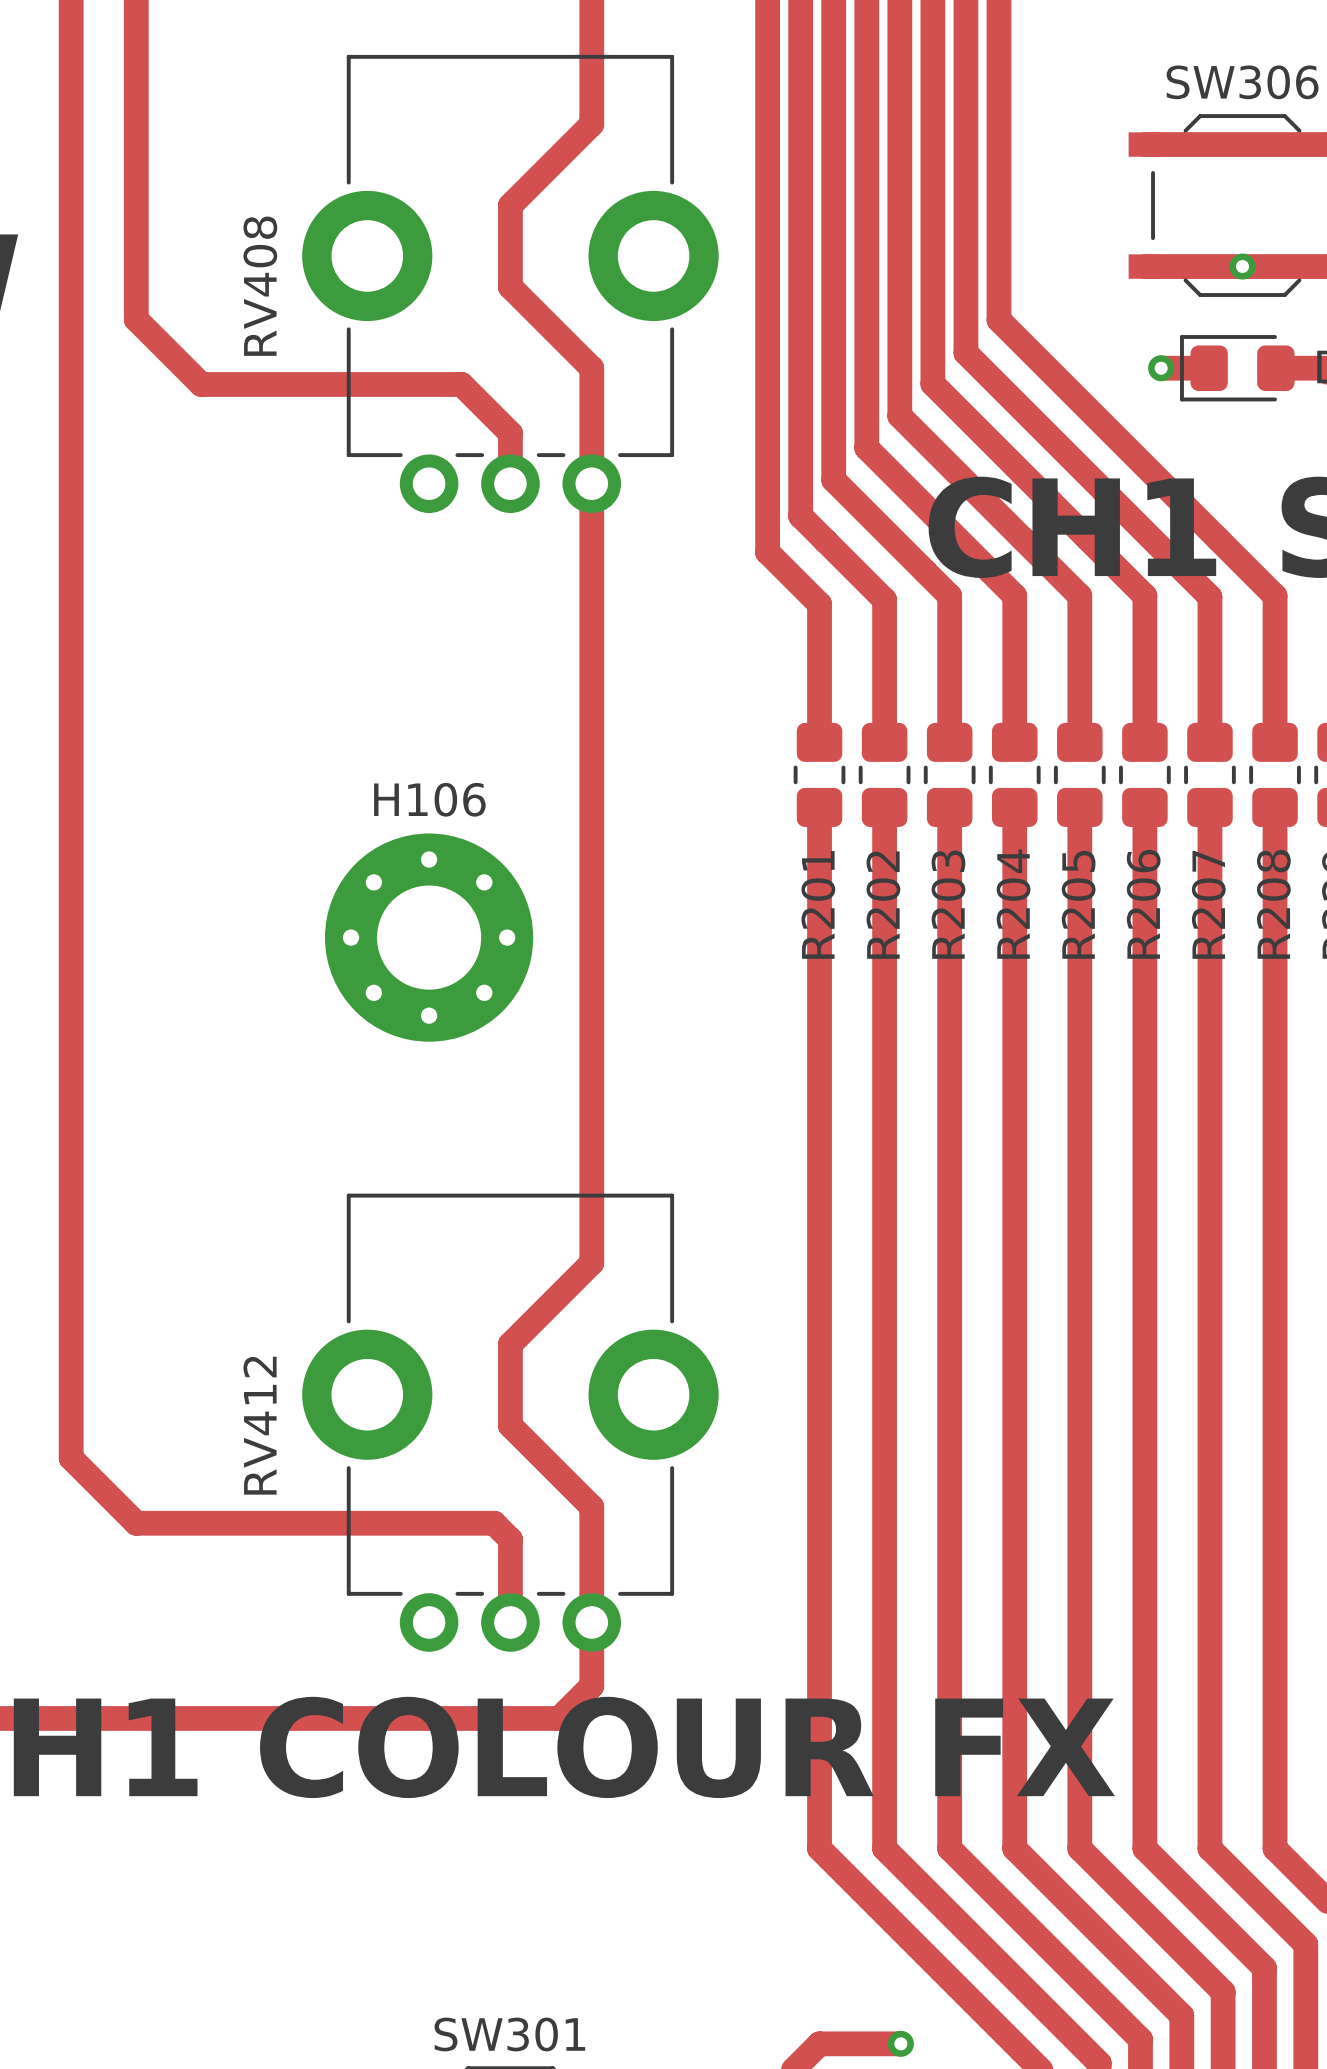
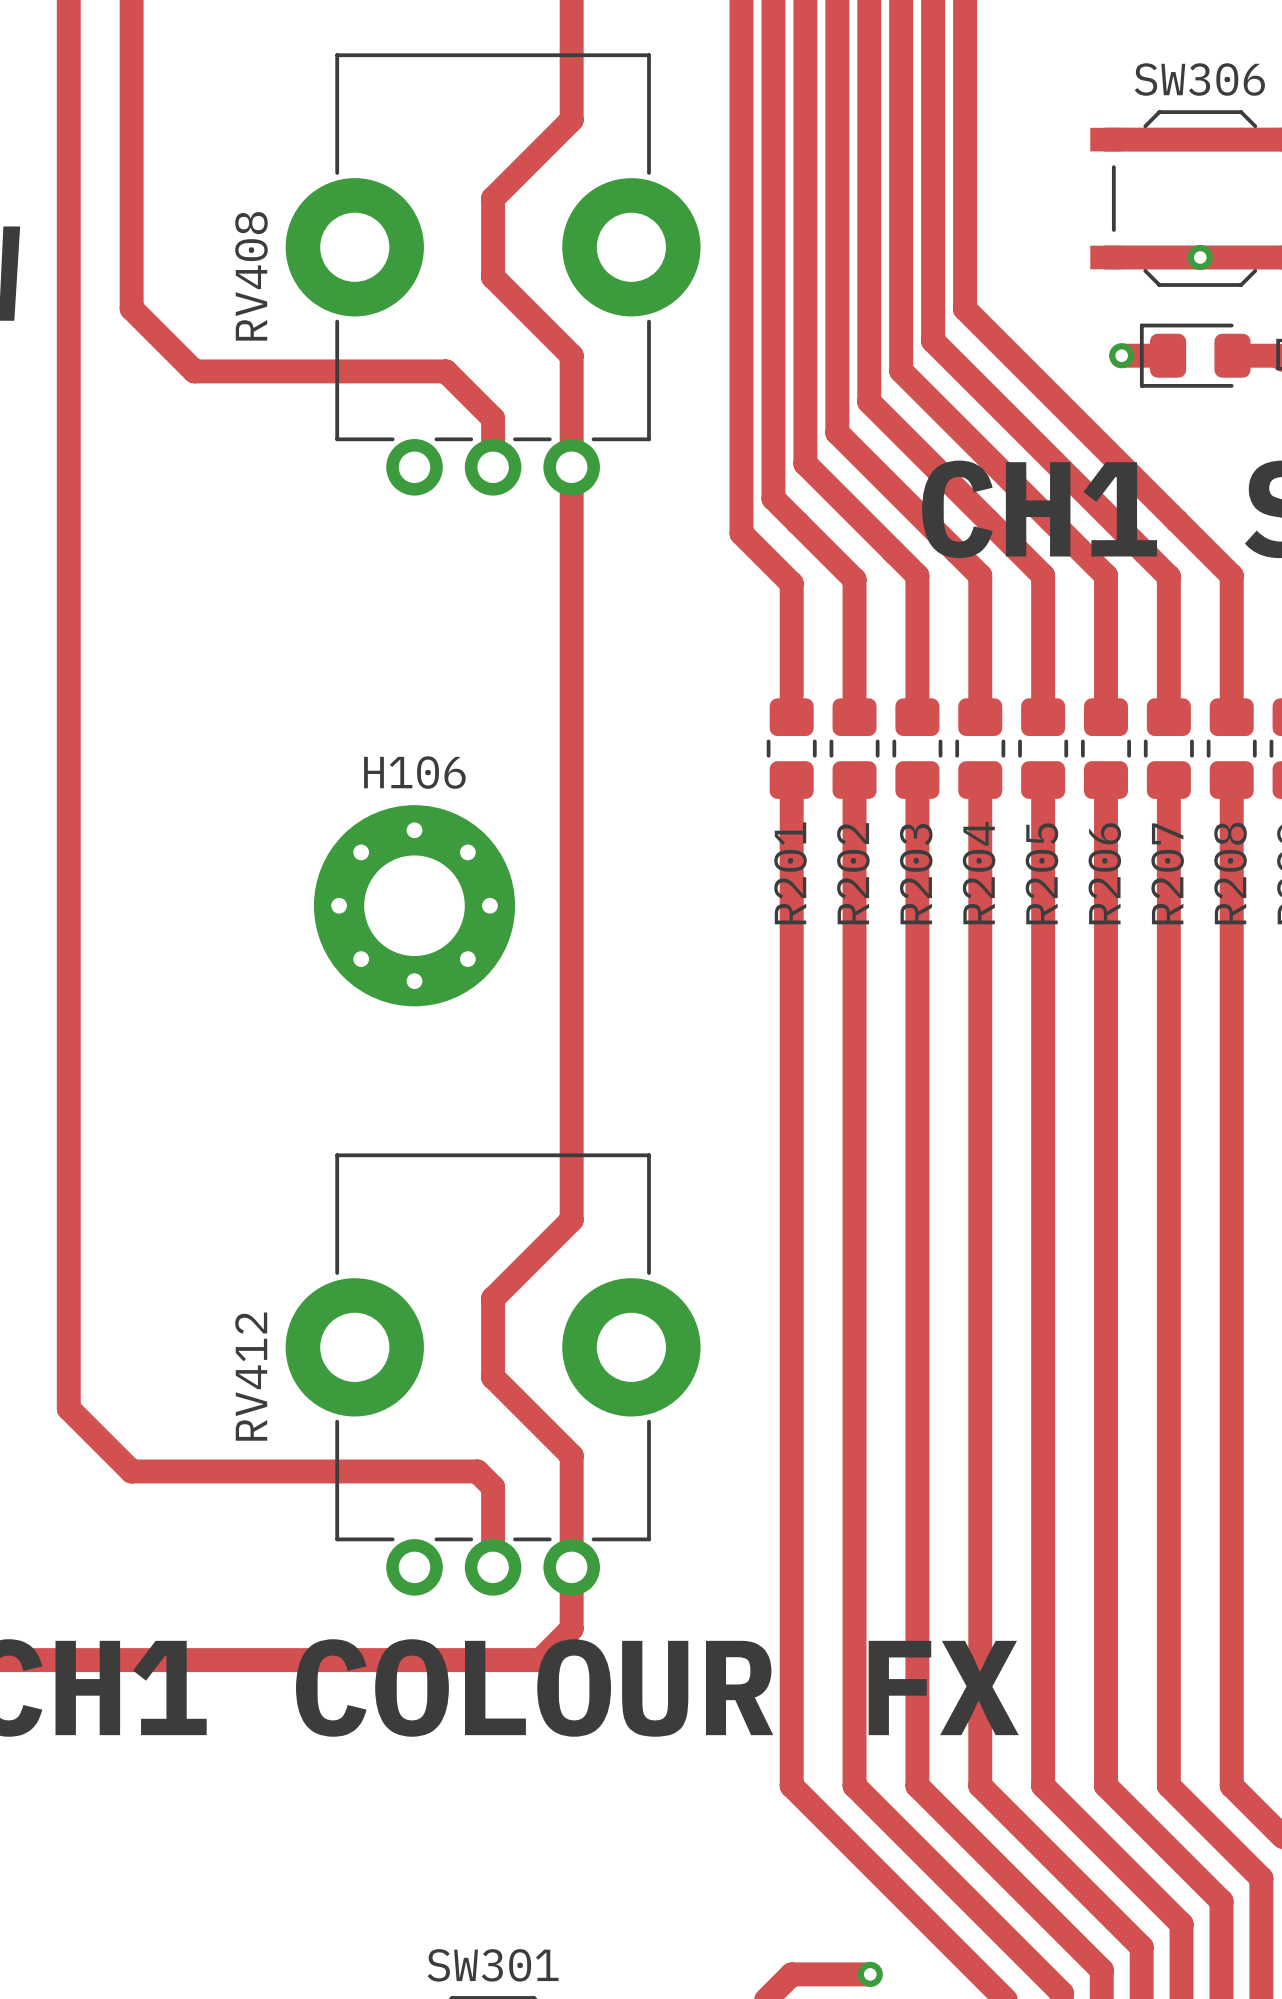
RV408 footprint: [302, 54, 719, 514] -> [285, 53, 701, 496]
RV412 footprint: [302, 1193, 719, 1652] -> [285, 1153, 701, 1596]

